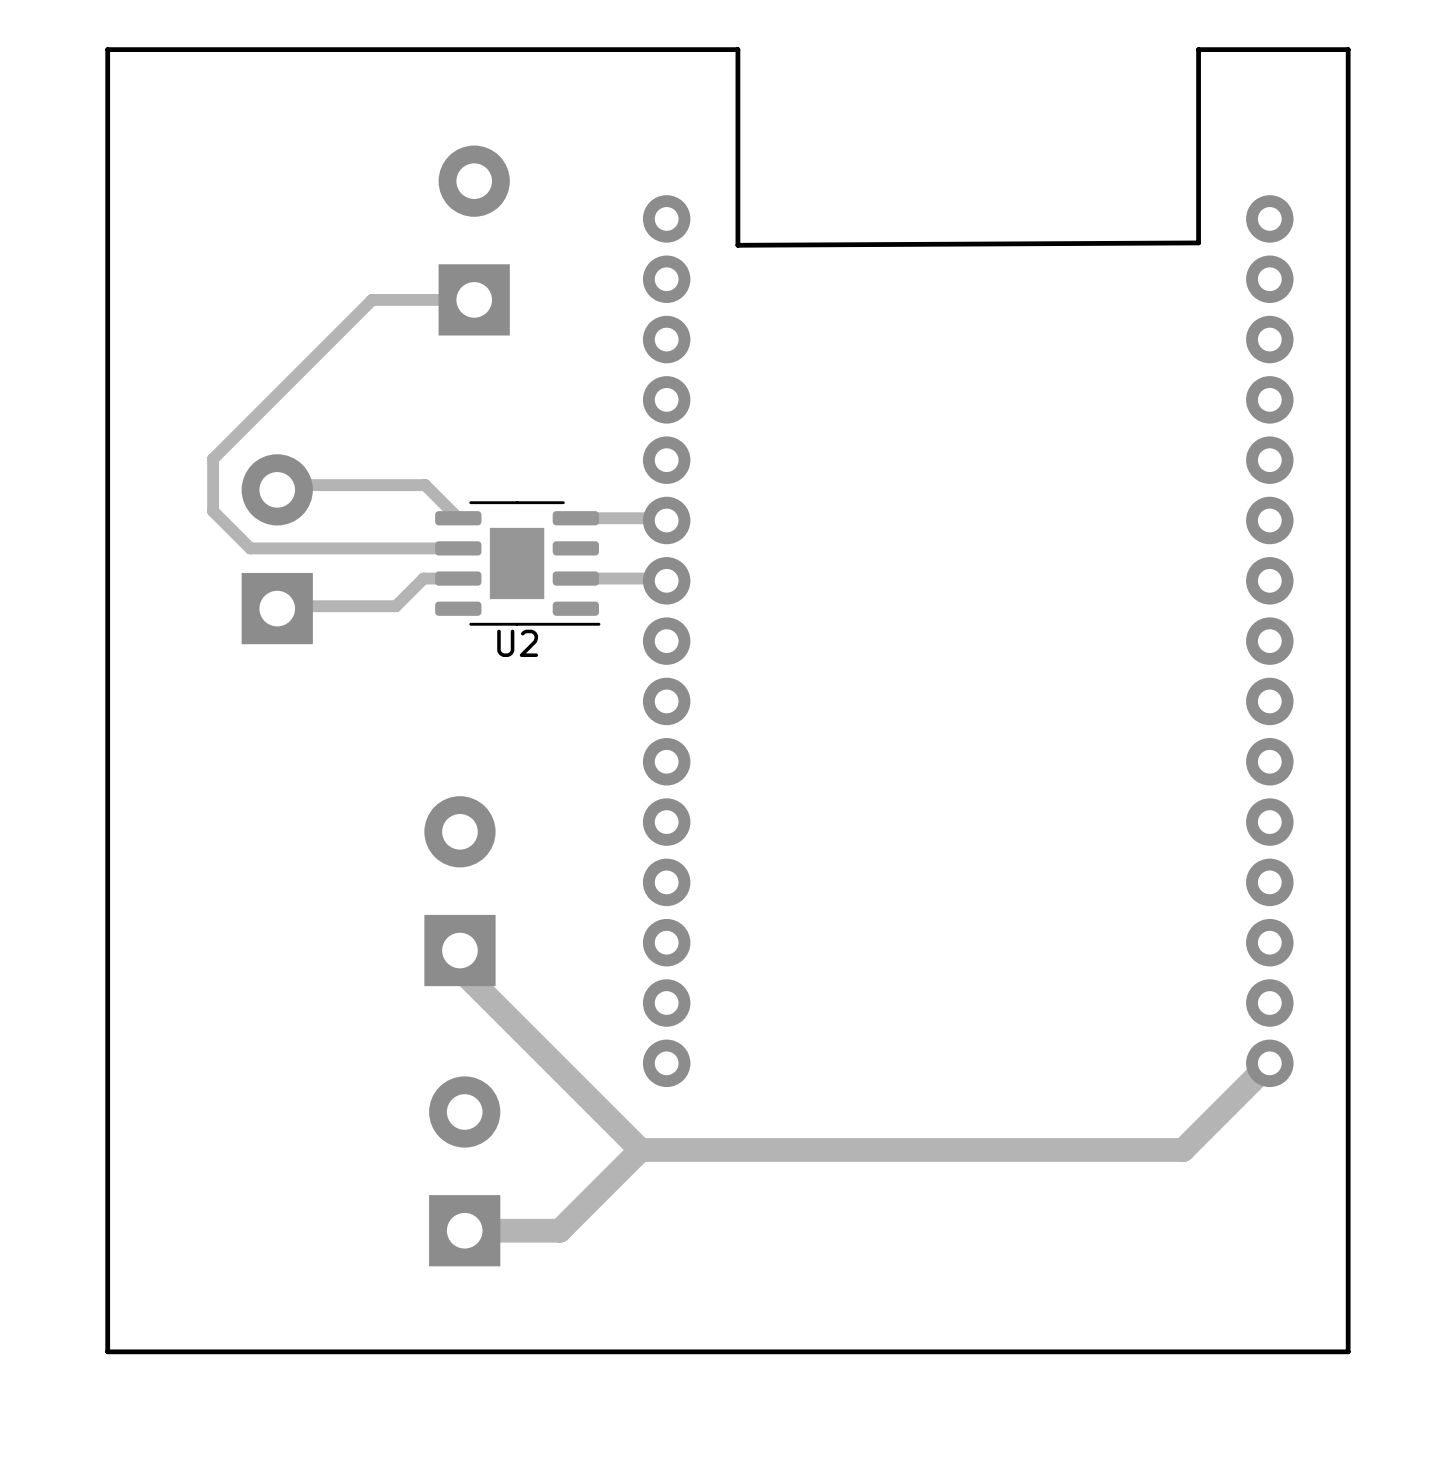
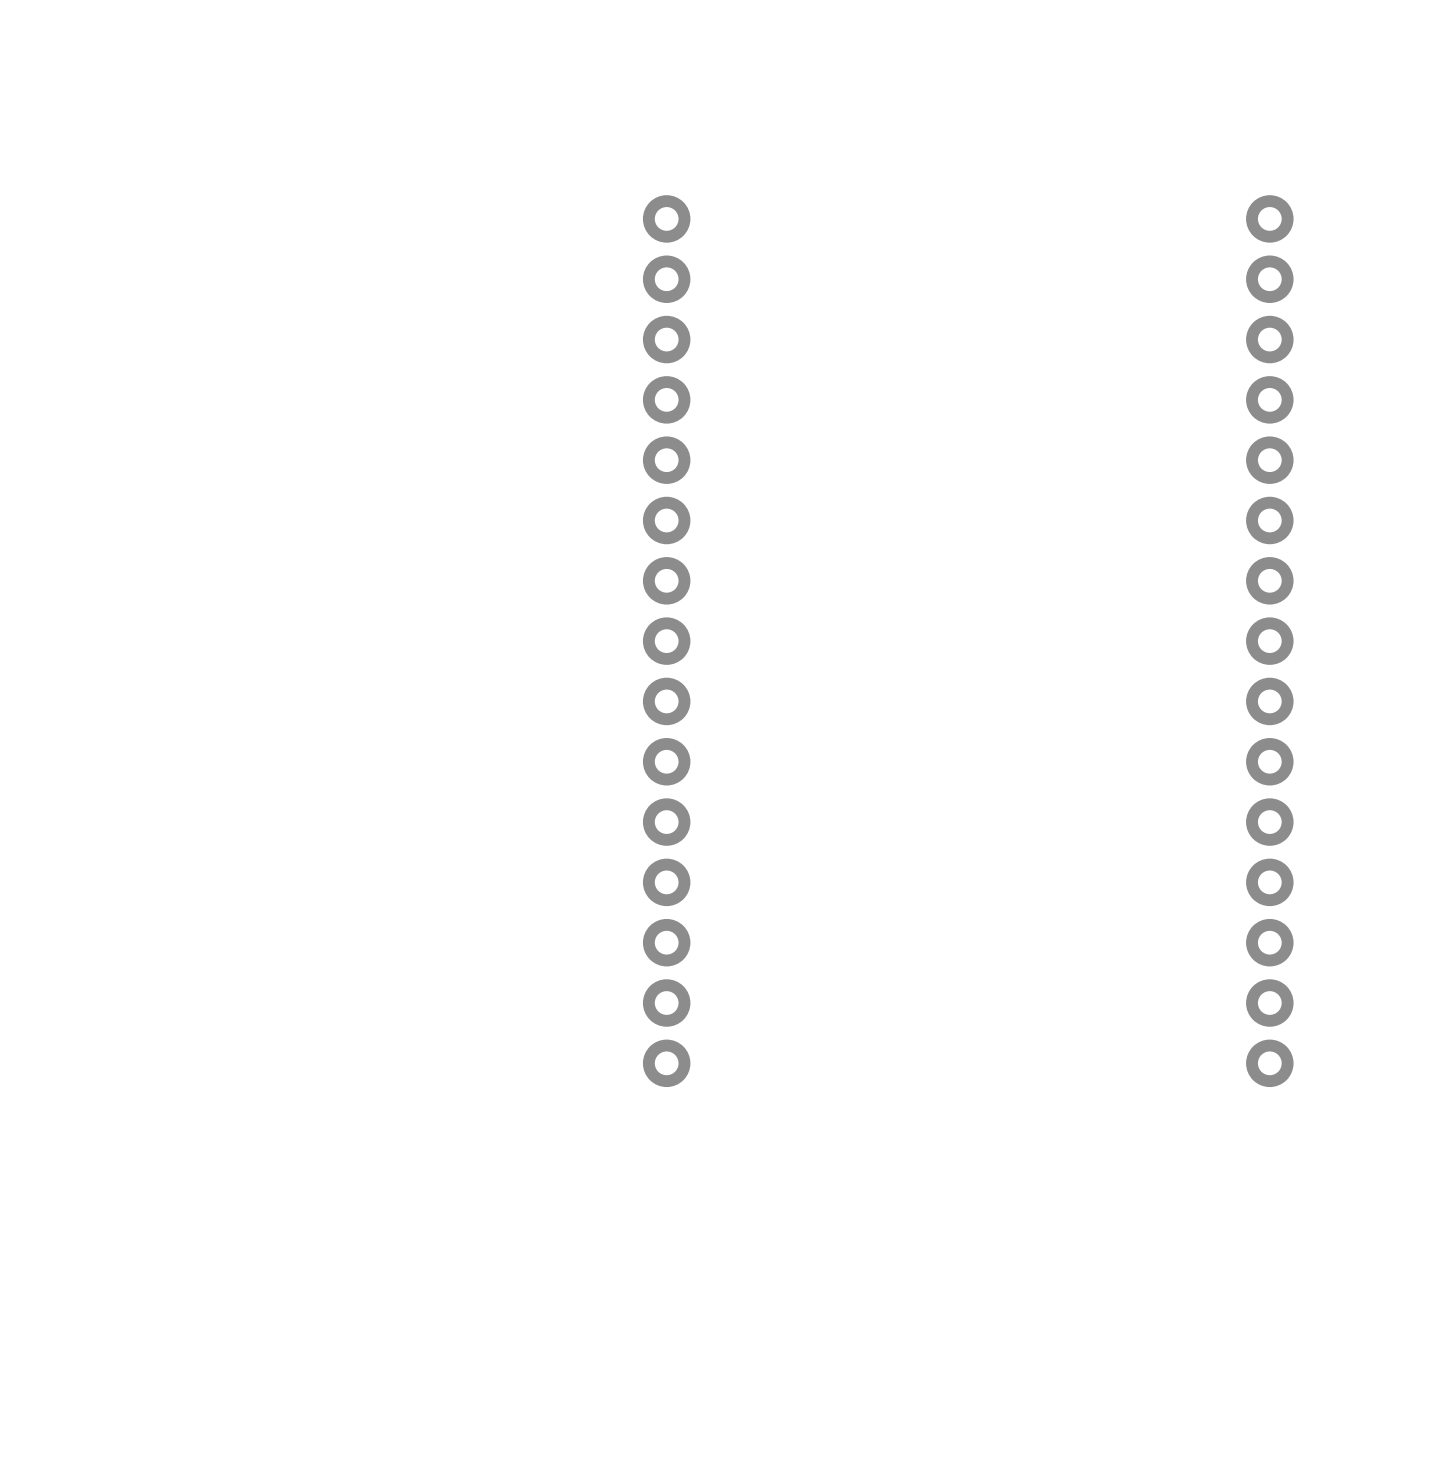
board edge: (1348, 49) (1198, 49) (1198, 242) (737, 245) (737, 49) (107, 49) (107, 1351) (1348, 1351) (1348, 49) -> none
part: (474, 240) -> none
track: (474, 299) (372, 299) (213, 459) (213, 511) (250, 548) (458, 548) -> none
track: (277, 489) (281, 485) (425, 485) (458, 518) -> none
track: (575, 518) (664, 518) (666, 520) -> none
part: (277, 549) -> none
U2: (517, 563) -> none
track: (458, 578) (423, 578) (395, 606) (279, 606) (277, 608) -> none
track: (575, 578) (664, 578) (666, 580) -> none
part: (459, 891) -> none
track: (459, 950) (459, 969) (640, 1149) -> none
track: (1269, 1063) (1183, 1149) (640, 1149) -> none
track: (640, 1149) (559, 1230) (464, 1230) -> none
part: (464, 1171) -> none

